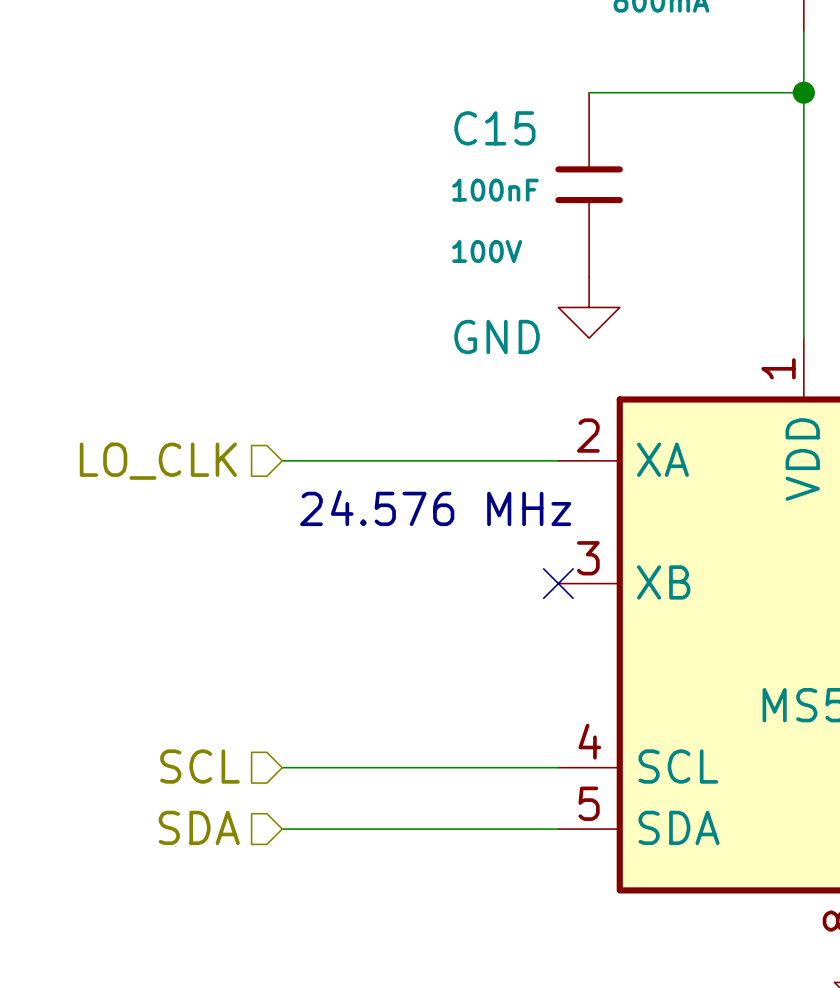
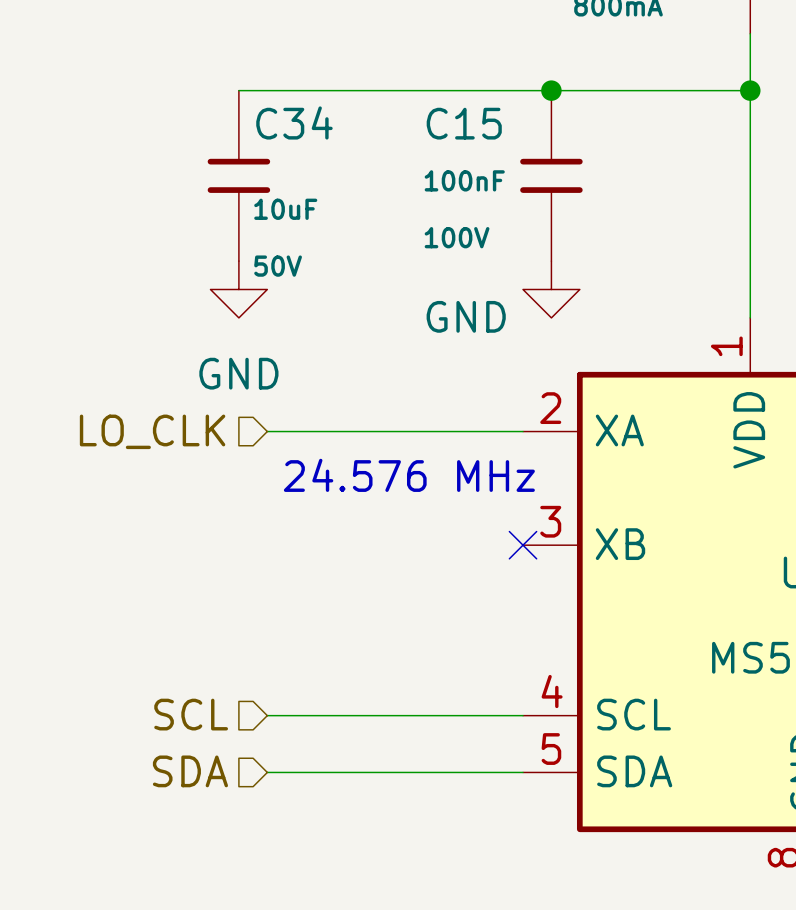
wire: none -> (238, 90) (551, 90)
junction: none -> (551, 90)
C34: none -> 10uF (238, 175)
power symbol: none -> GND (238, 289)

